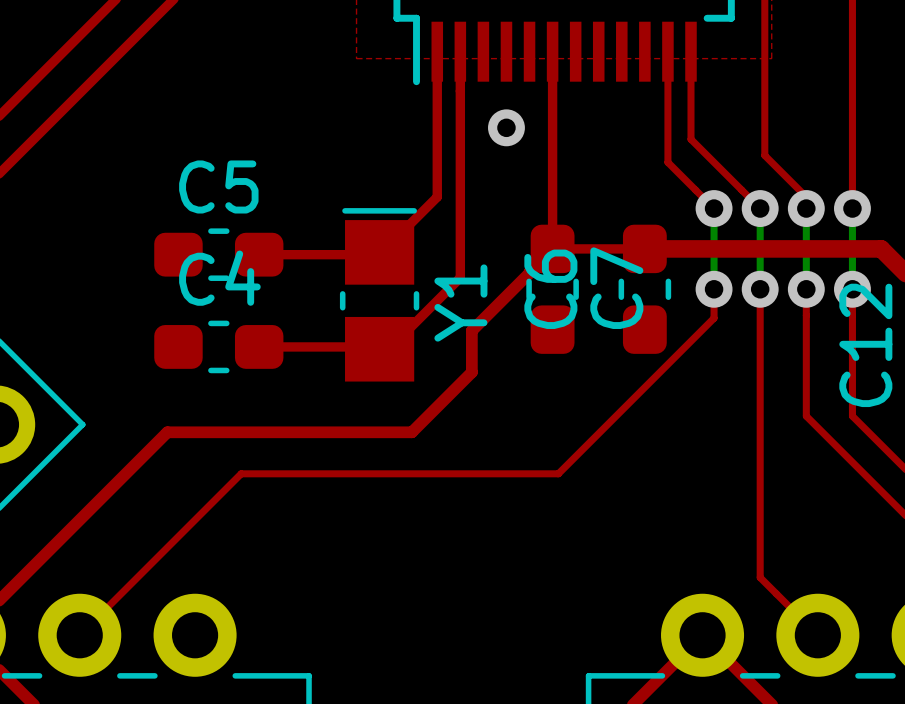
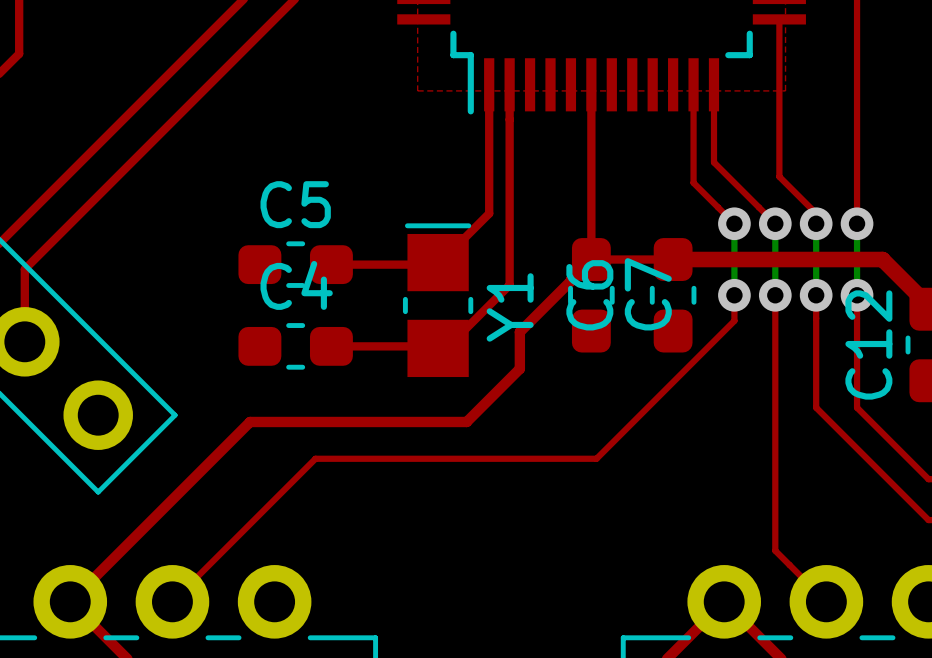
via: (506, 127) -> none

